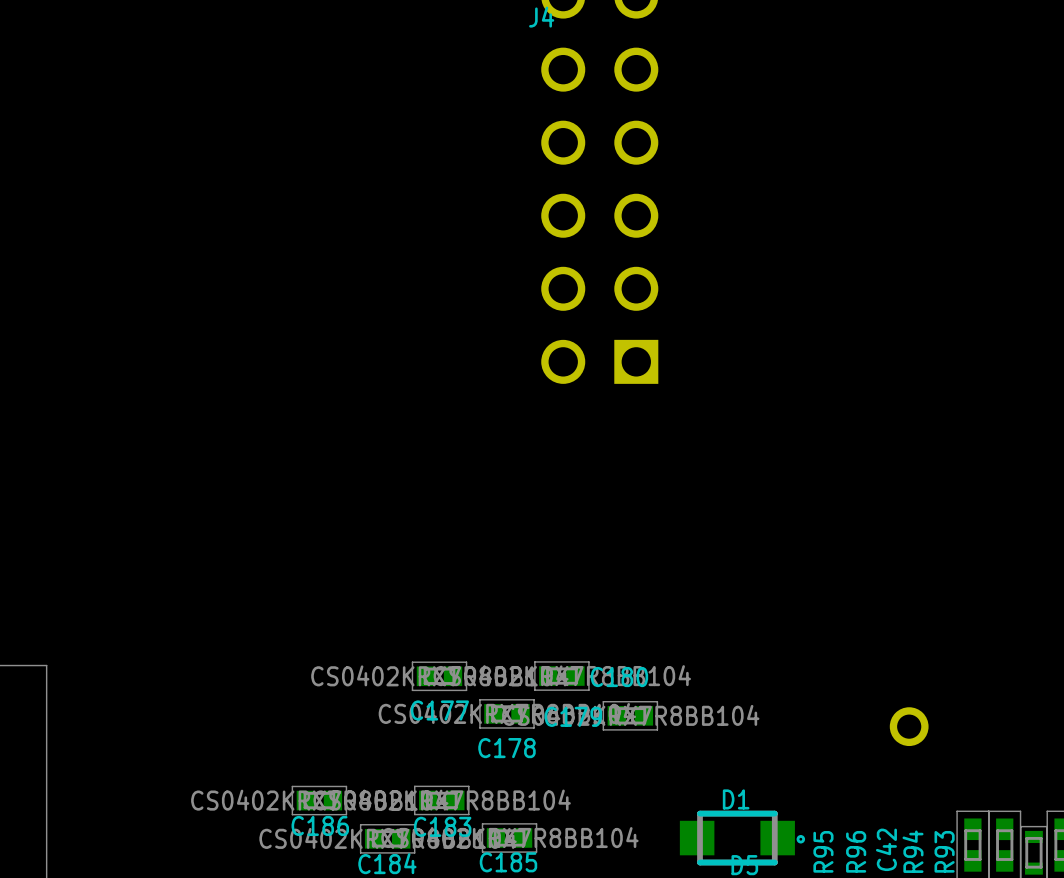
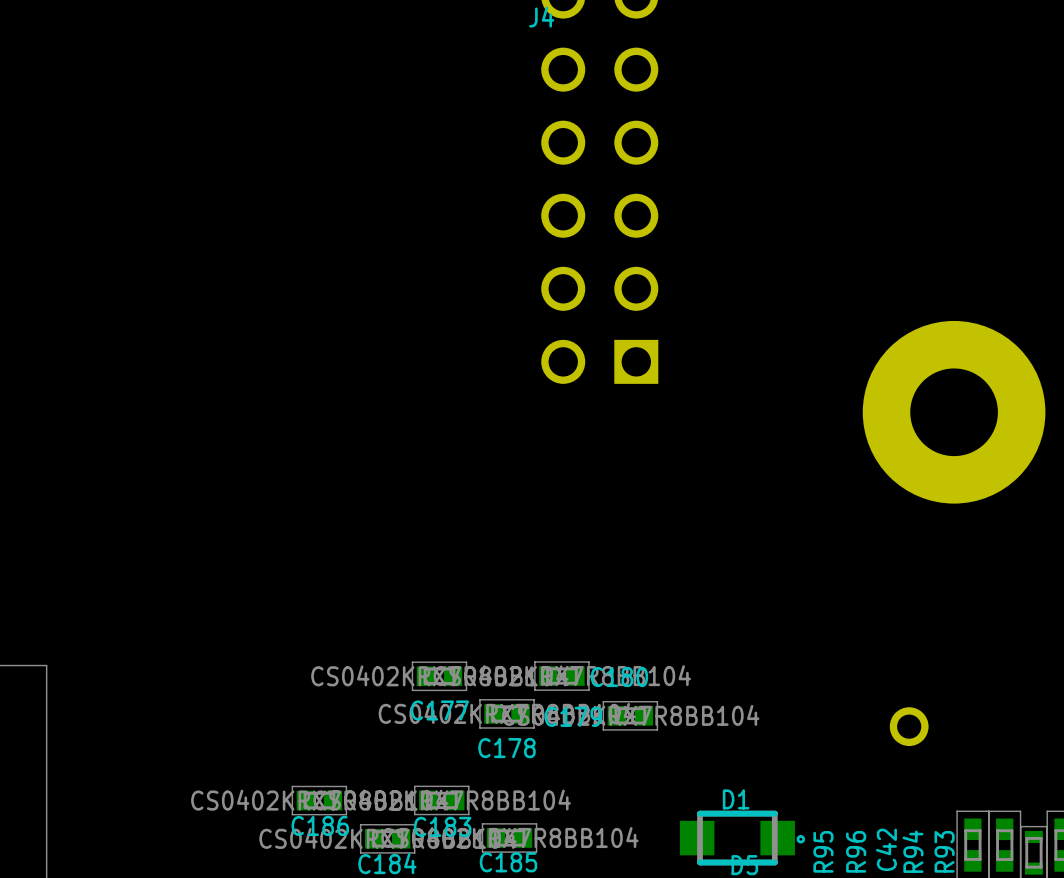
part: none -> (954, 412)

